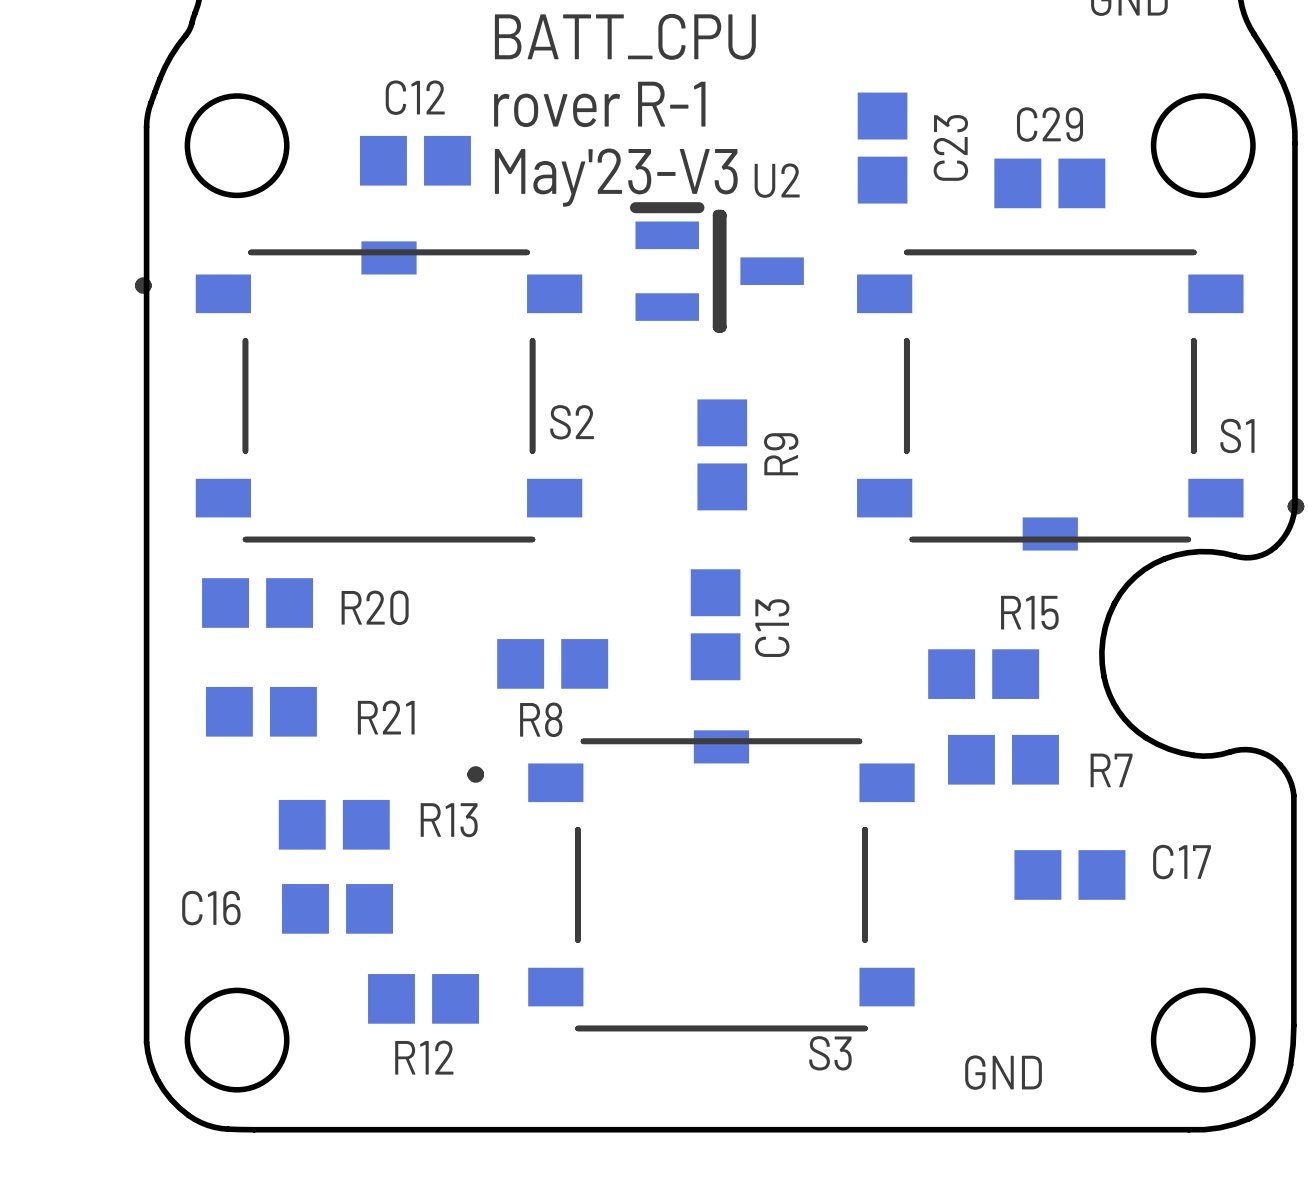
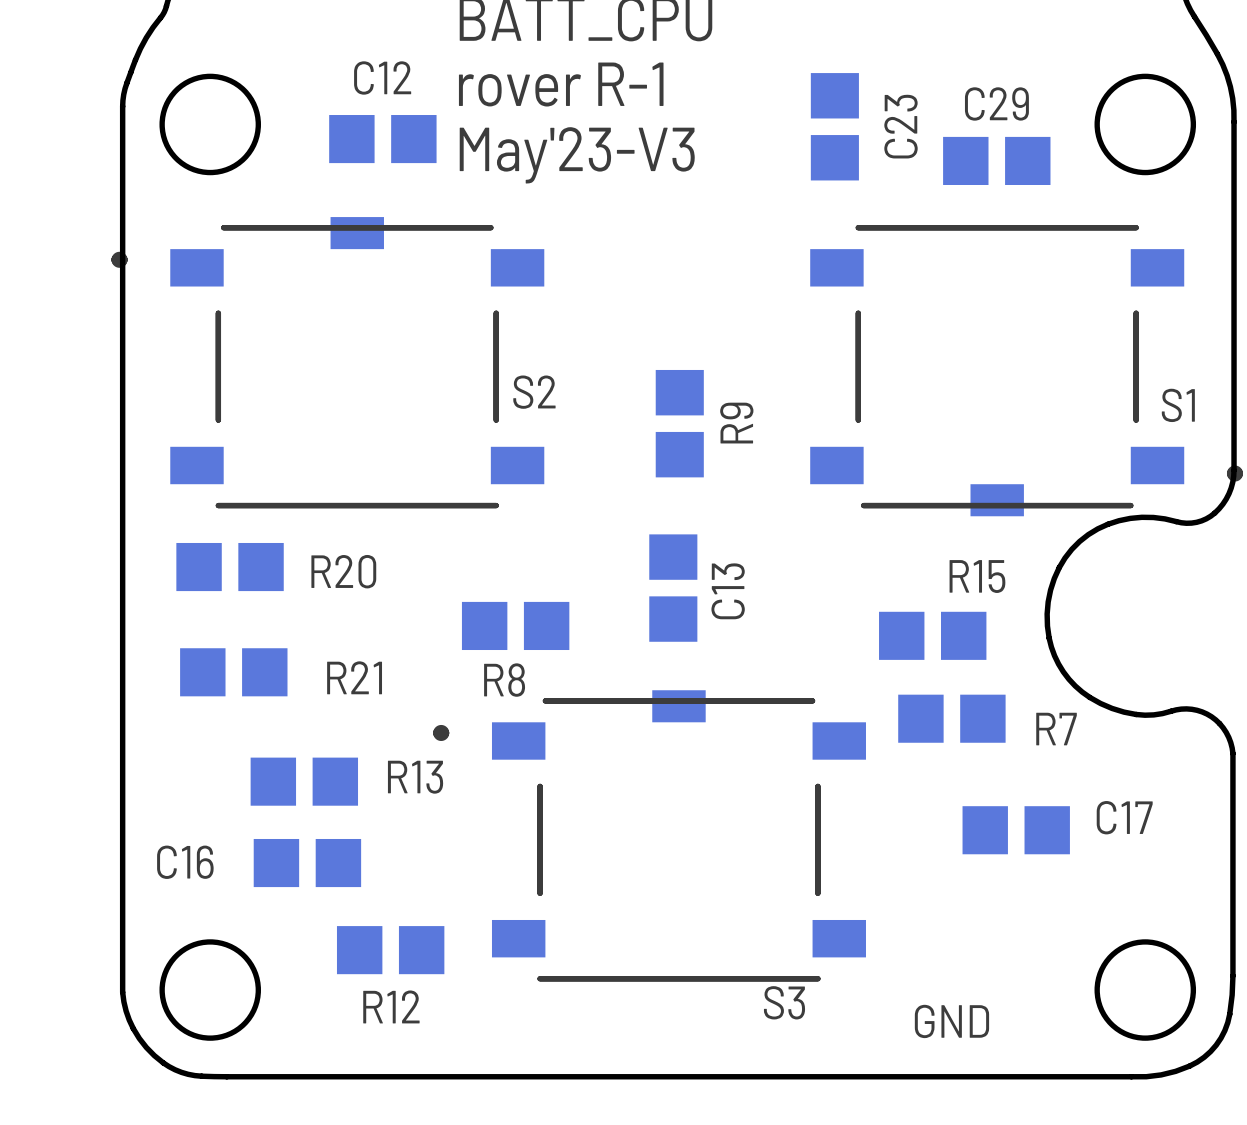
U2: (716, 267) -> none

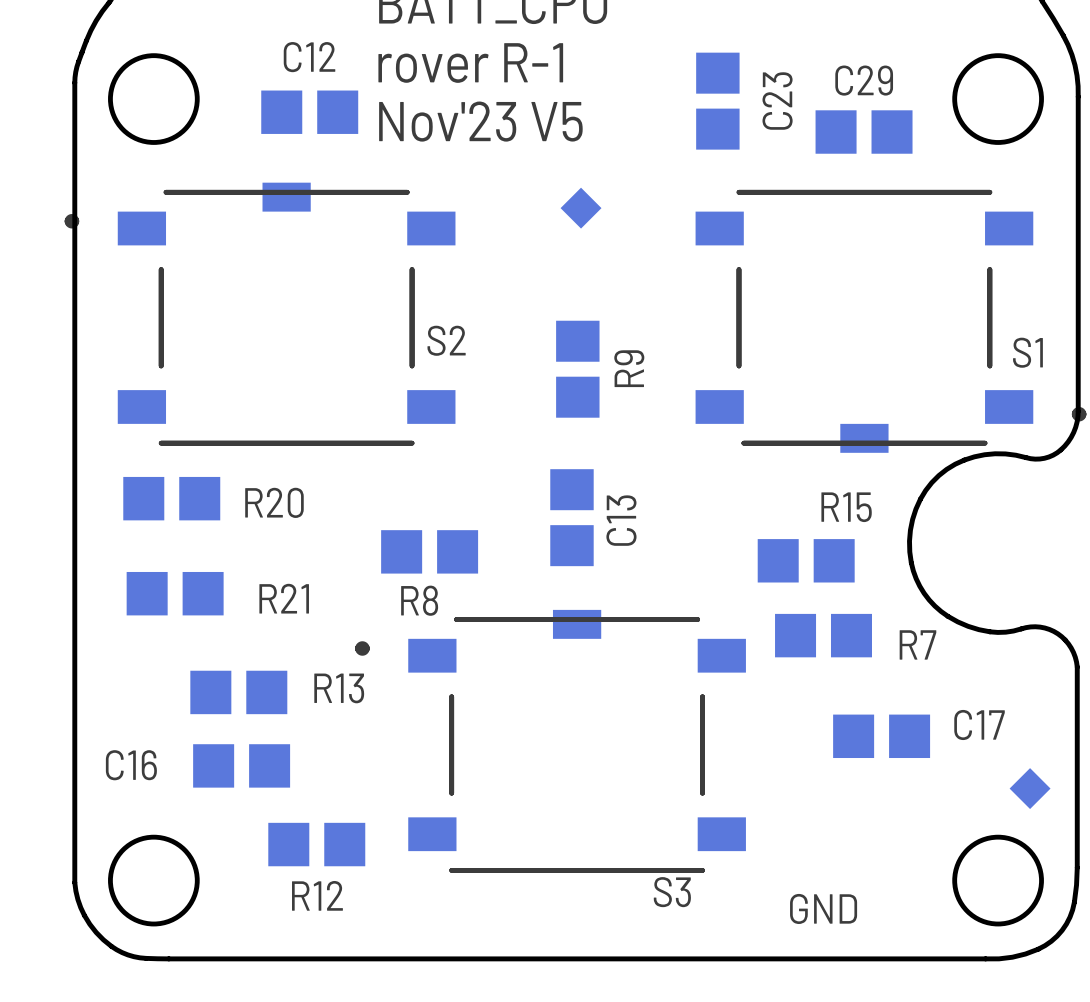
text: May'23-V3 (577, 155) -> Nov'23 V5 (480, 121)
part: none -> (581, 208)
part: none -> (1030, 788)

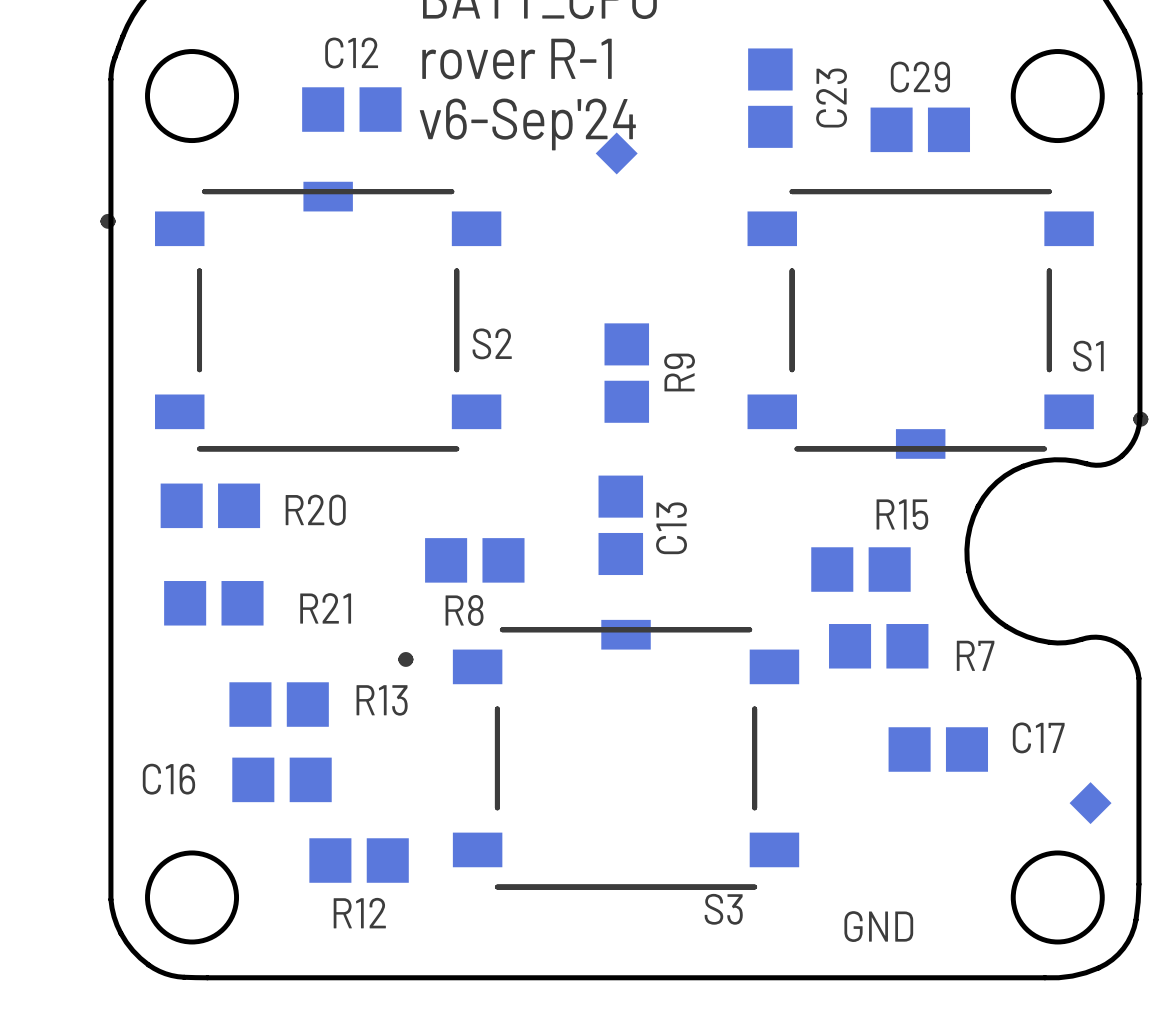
text: Nov'23 V5 (480, 121) -> v6-Sep'24 (527, 124)
part position: (581, 208) -> (616, 153)

